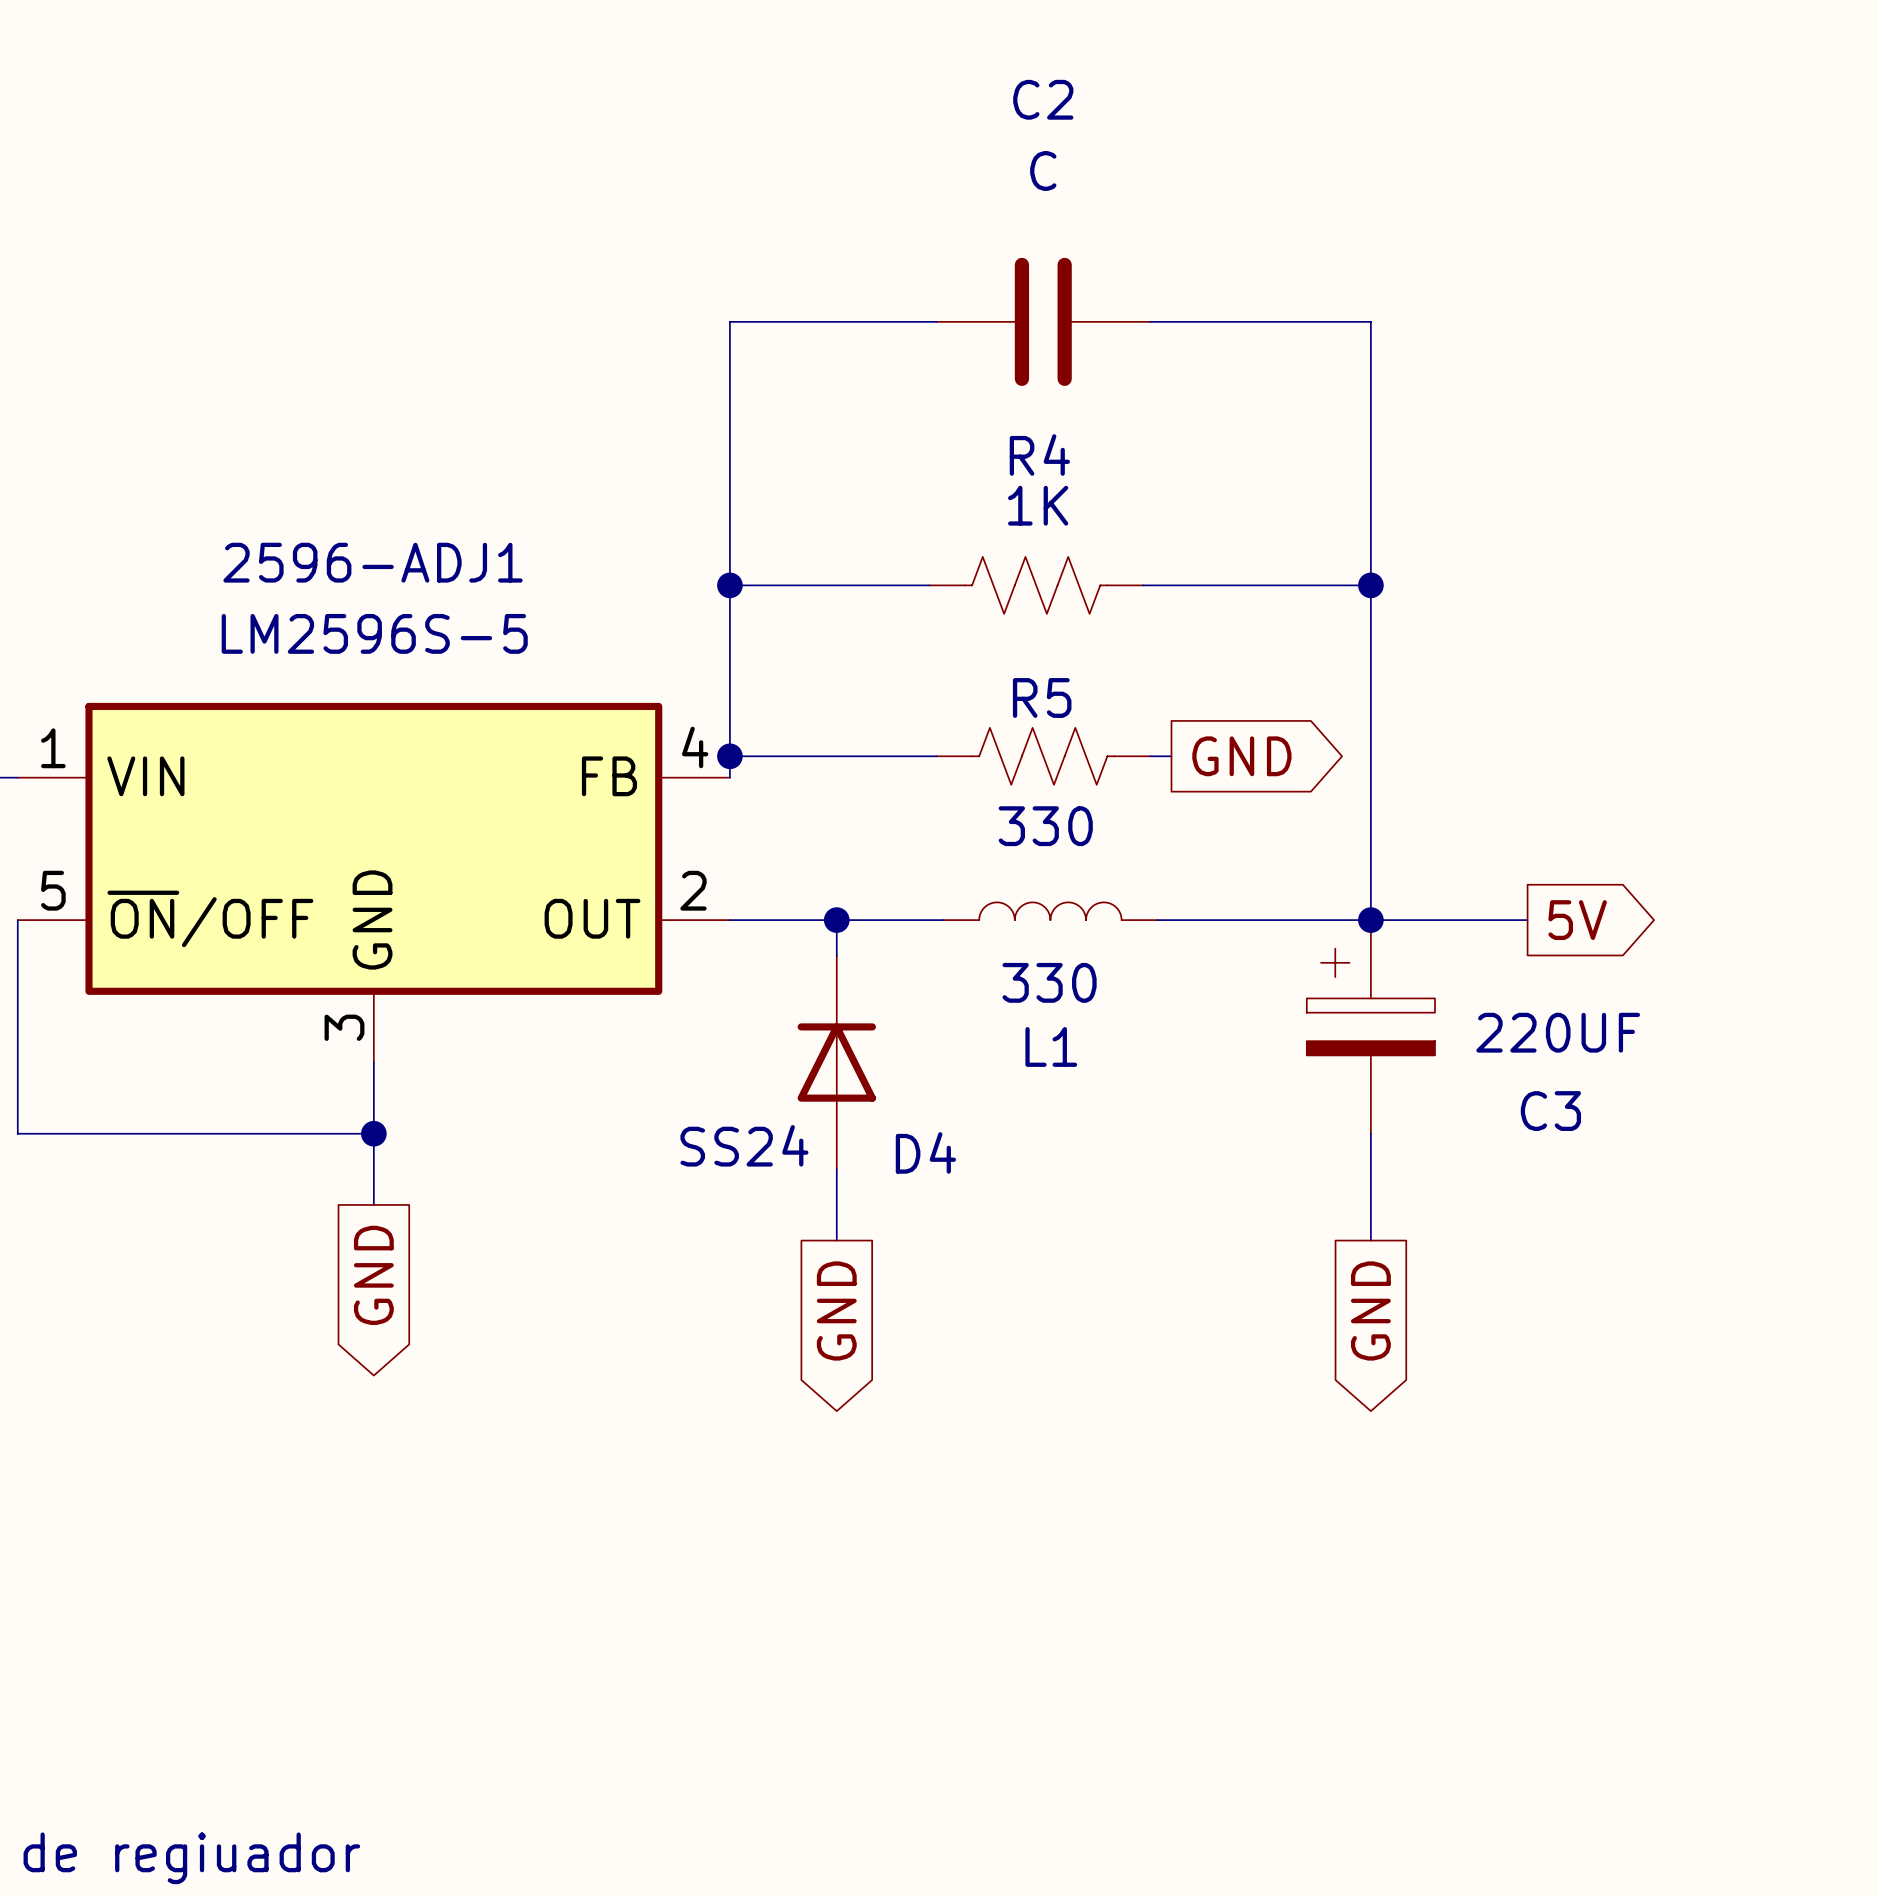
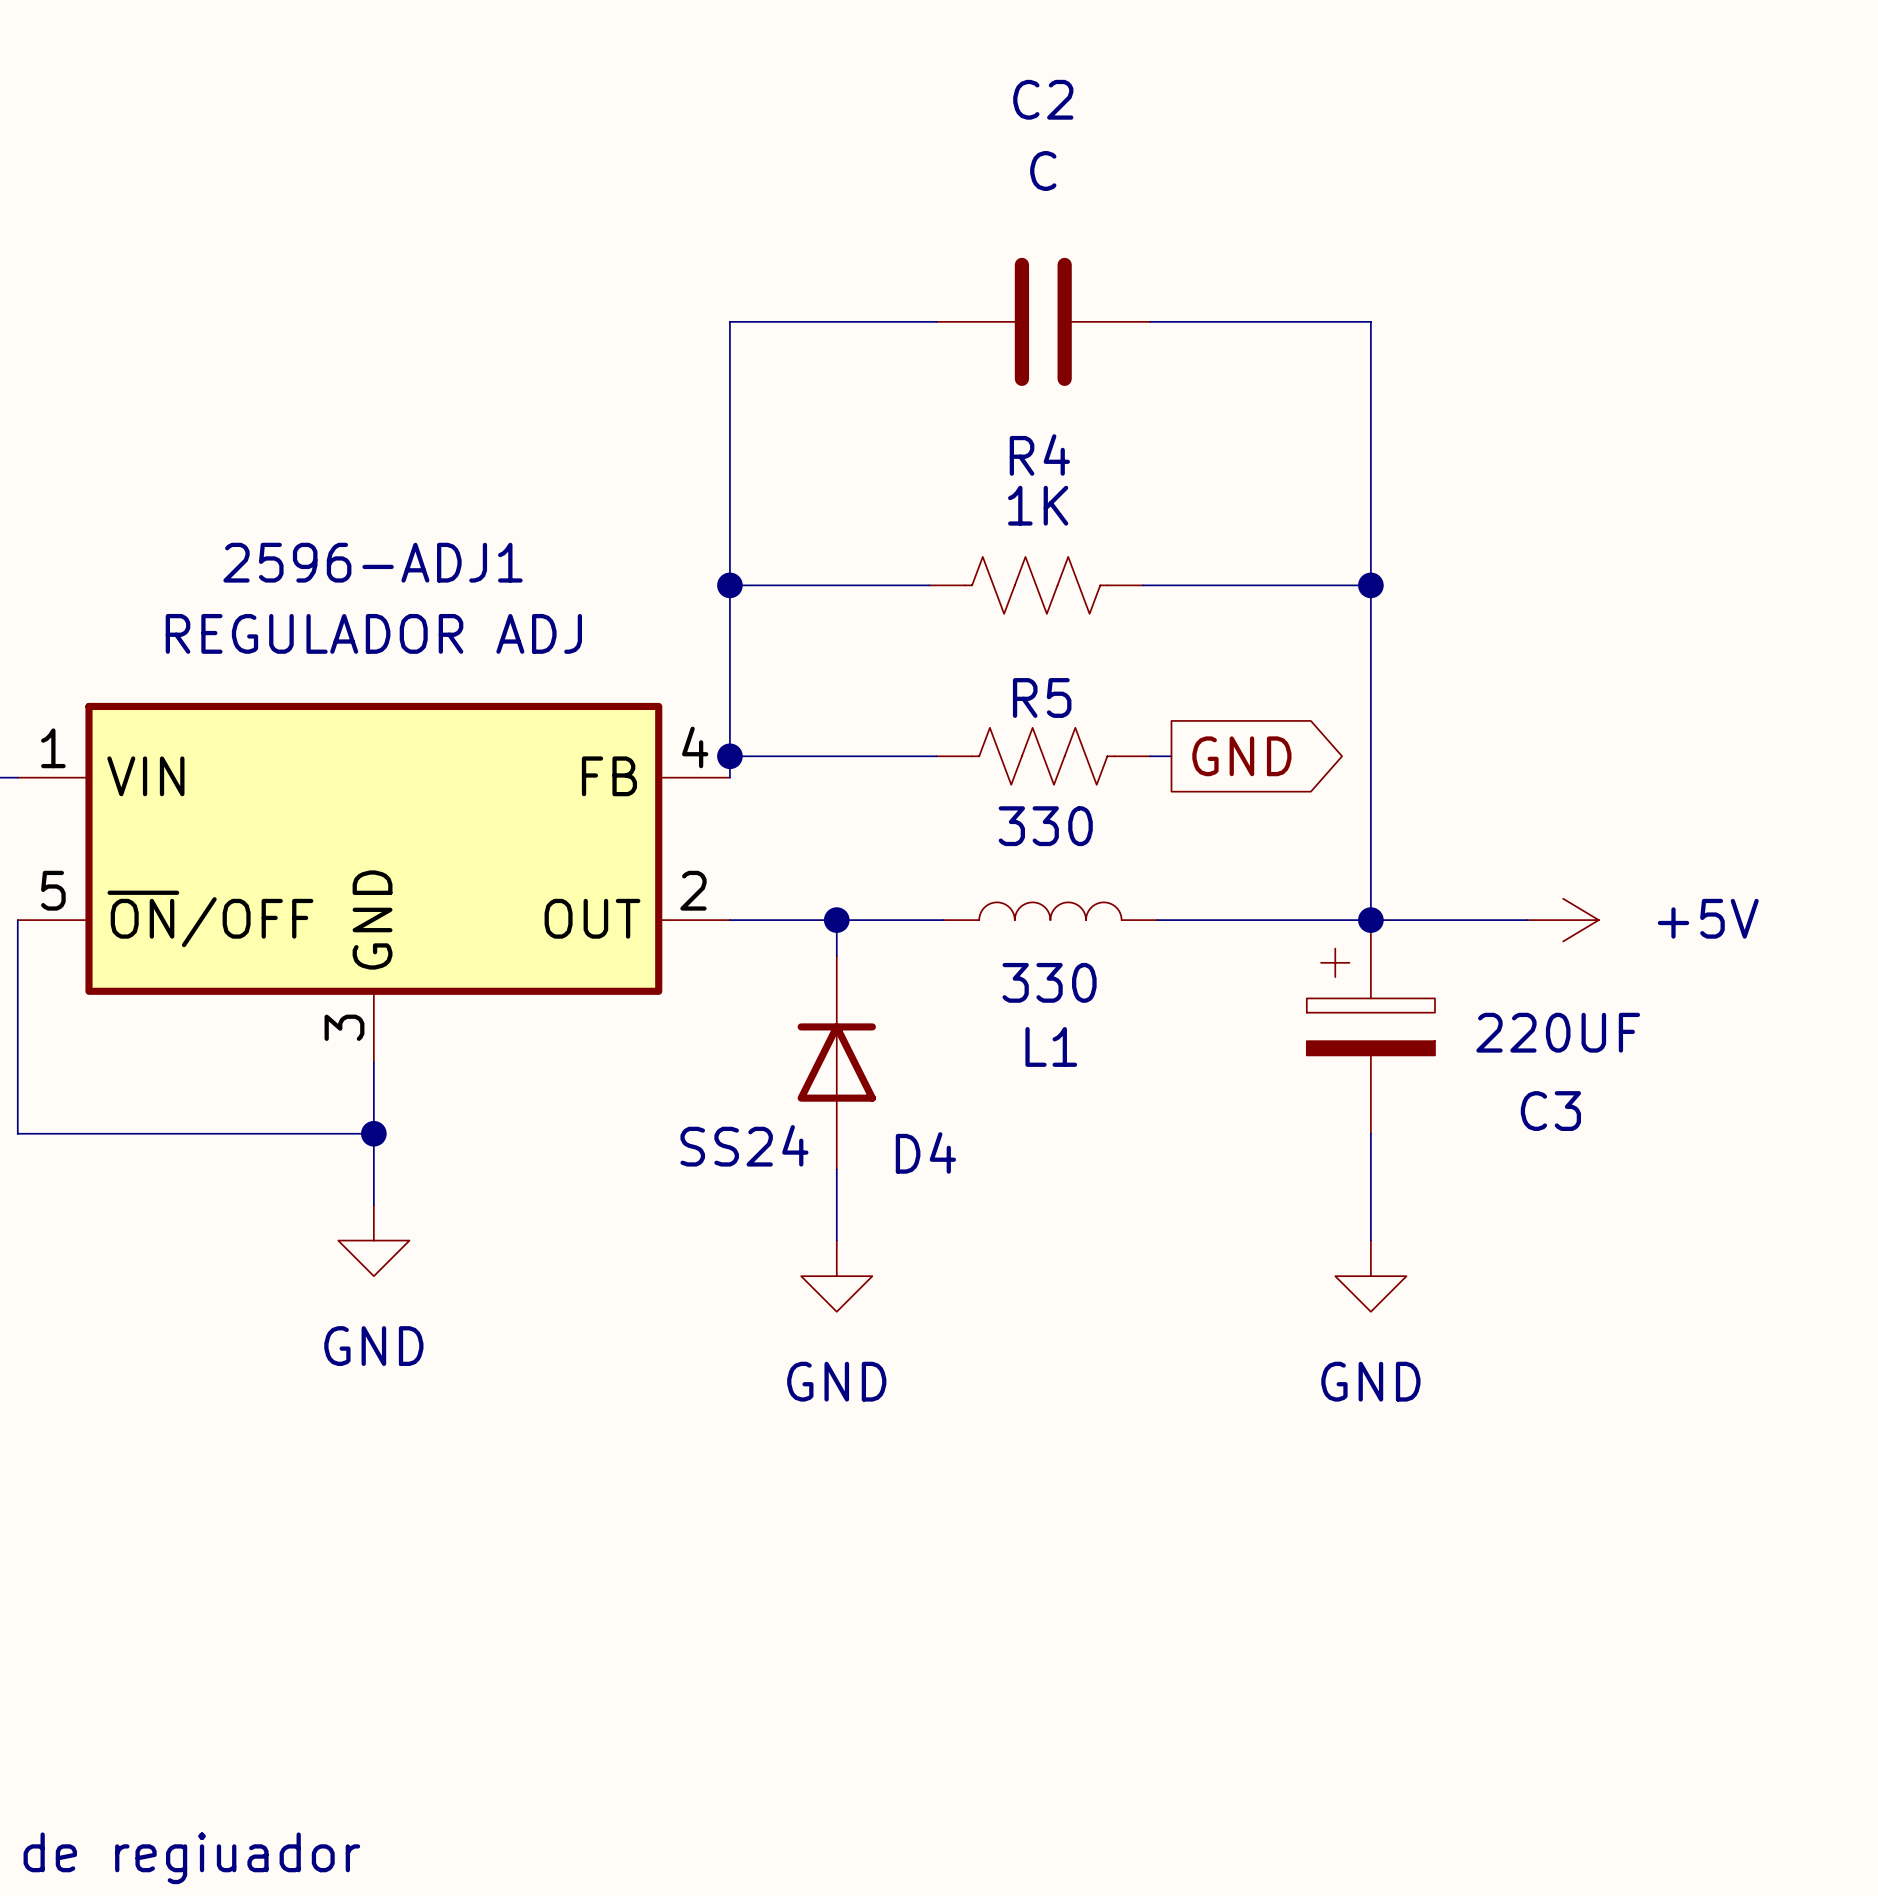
2596-ADJ1 value: LM2596S-5 (374, 633) -> REGULADOR ADJ (373, 633)
power symbol: none -> +5V (1563, 920)
global label: 5V (1577, 920) -> none
power symbol: none -> GND (373, 1240)
global label: GND (373, 1275) -> none
power symbol: none -> GND (836, 1276)
power symbol: none -> GND (1370, 1276)
global label: GND (836, 1310) -> none
global label: GND (1370, 1310) -> none

